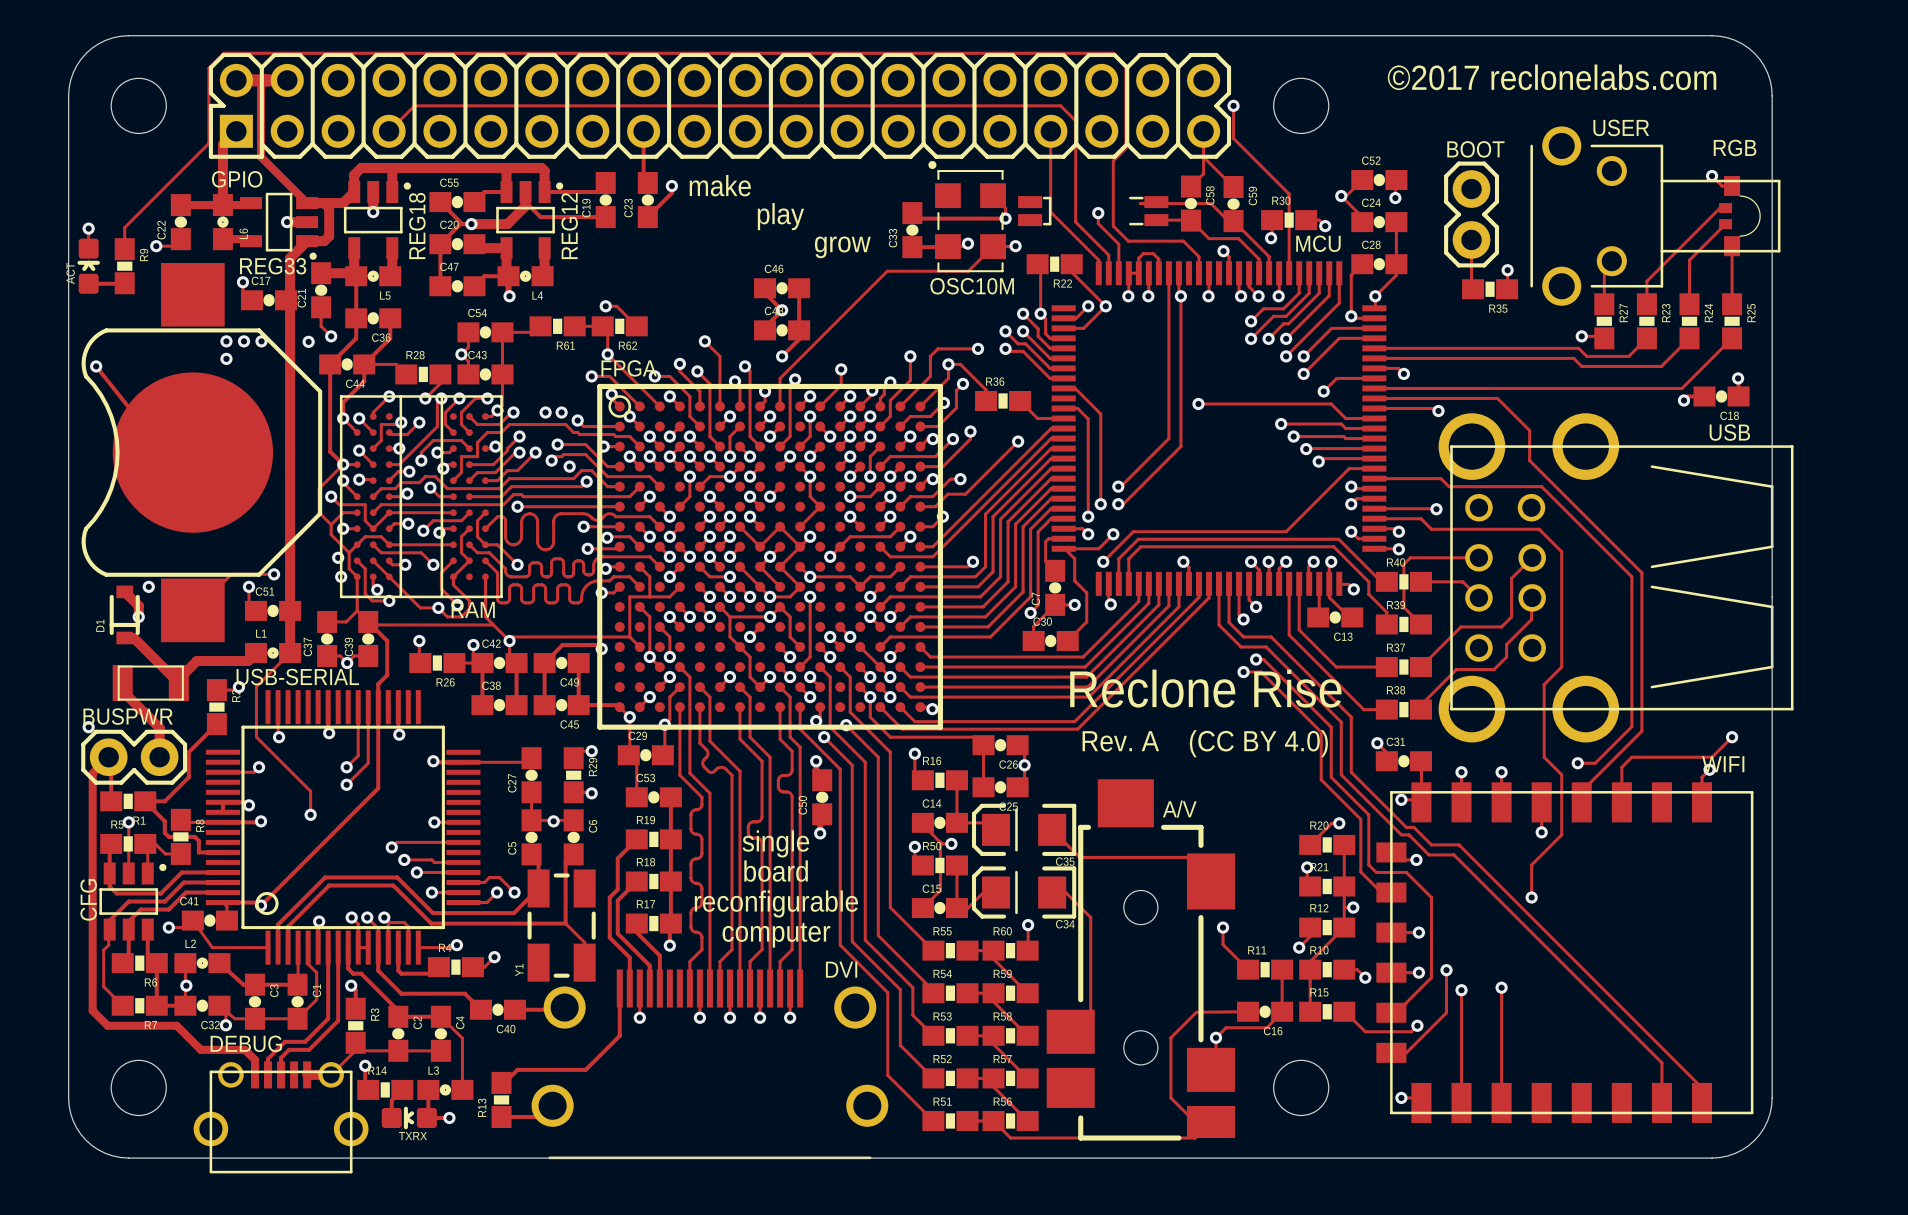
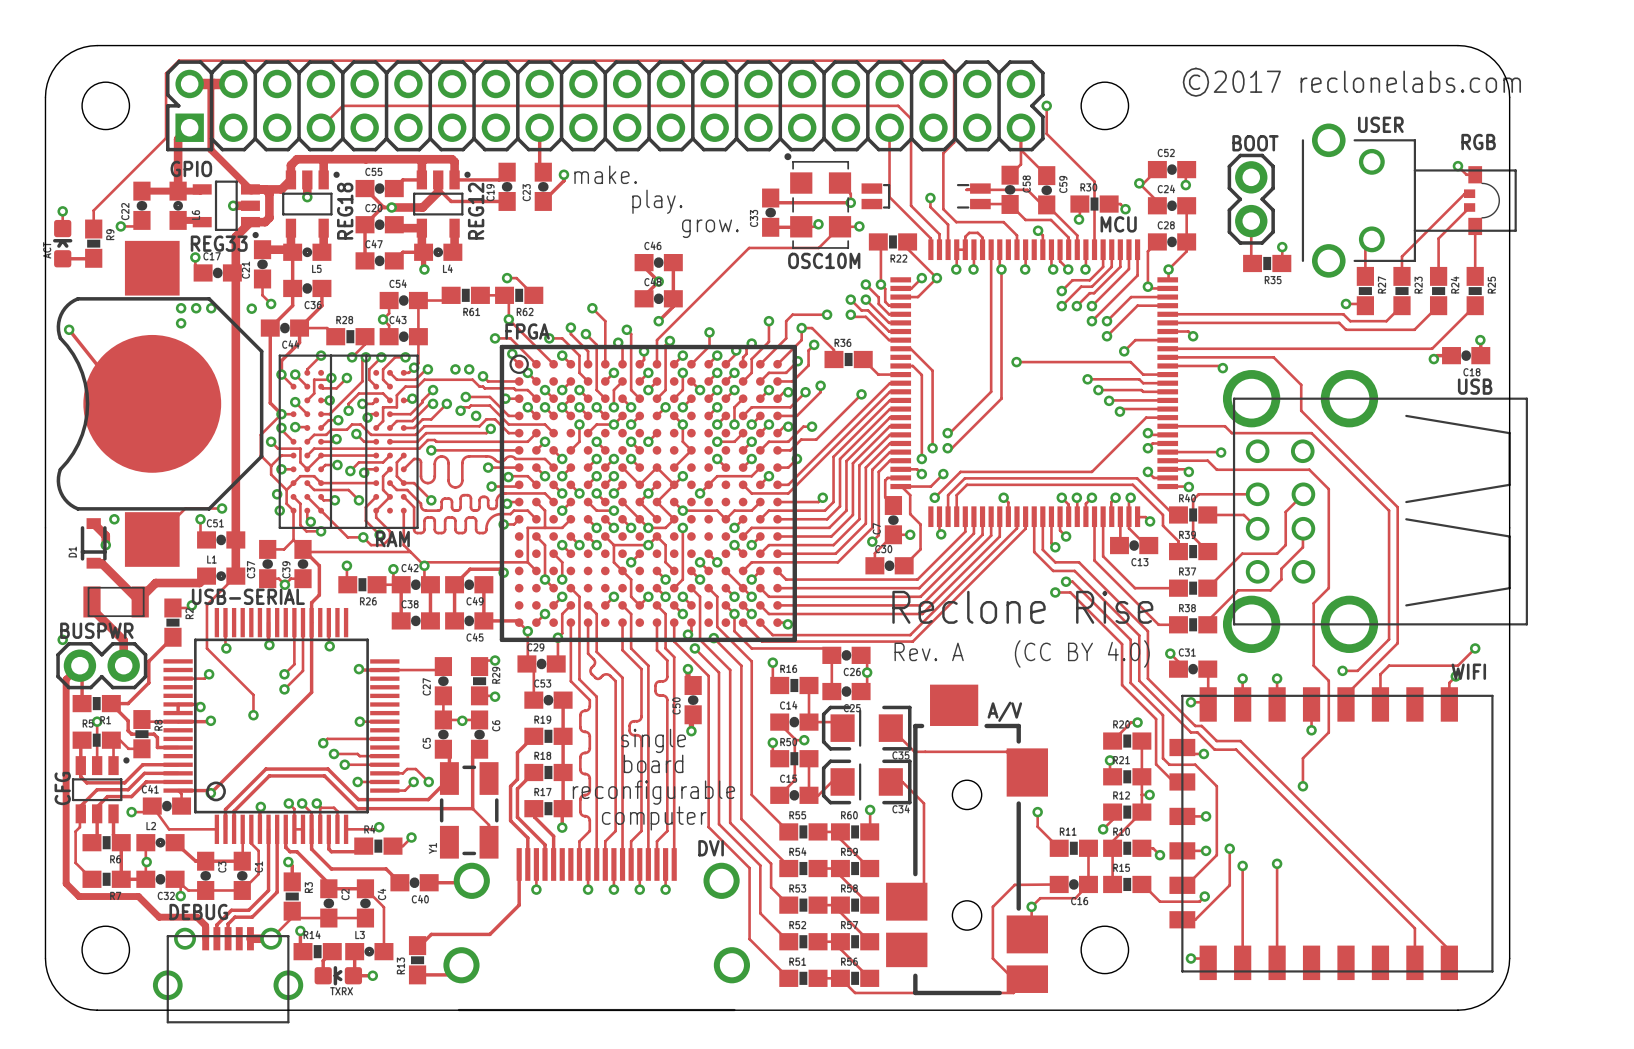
text: make (720, 185) -> make. (605, 174)
text: play (780, 216) -> play. (657, 201)
text: grow (842, 247) -> grow. (710, 228)

